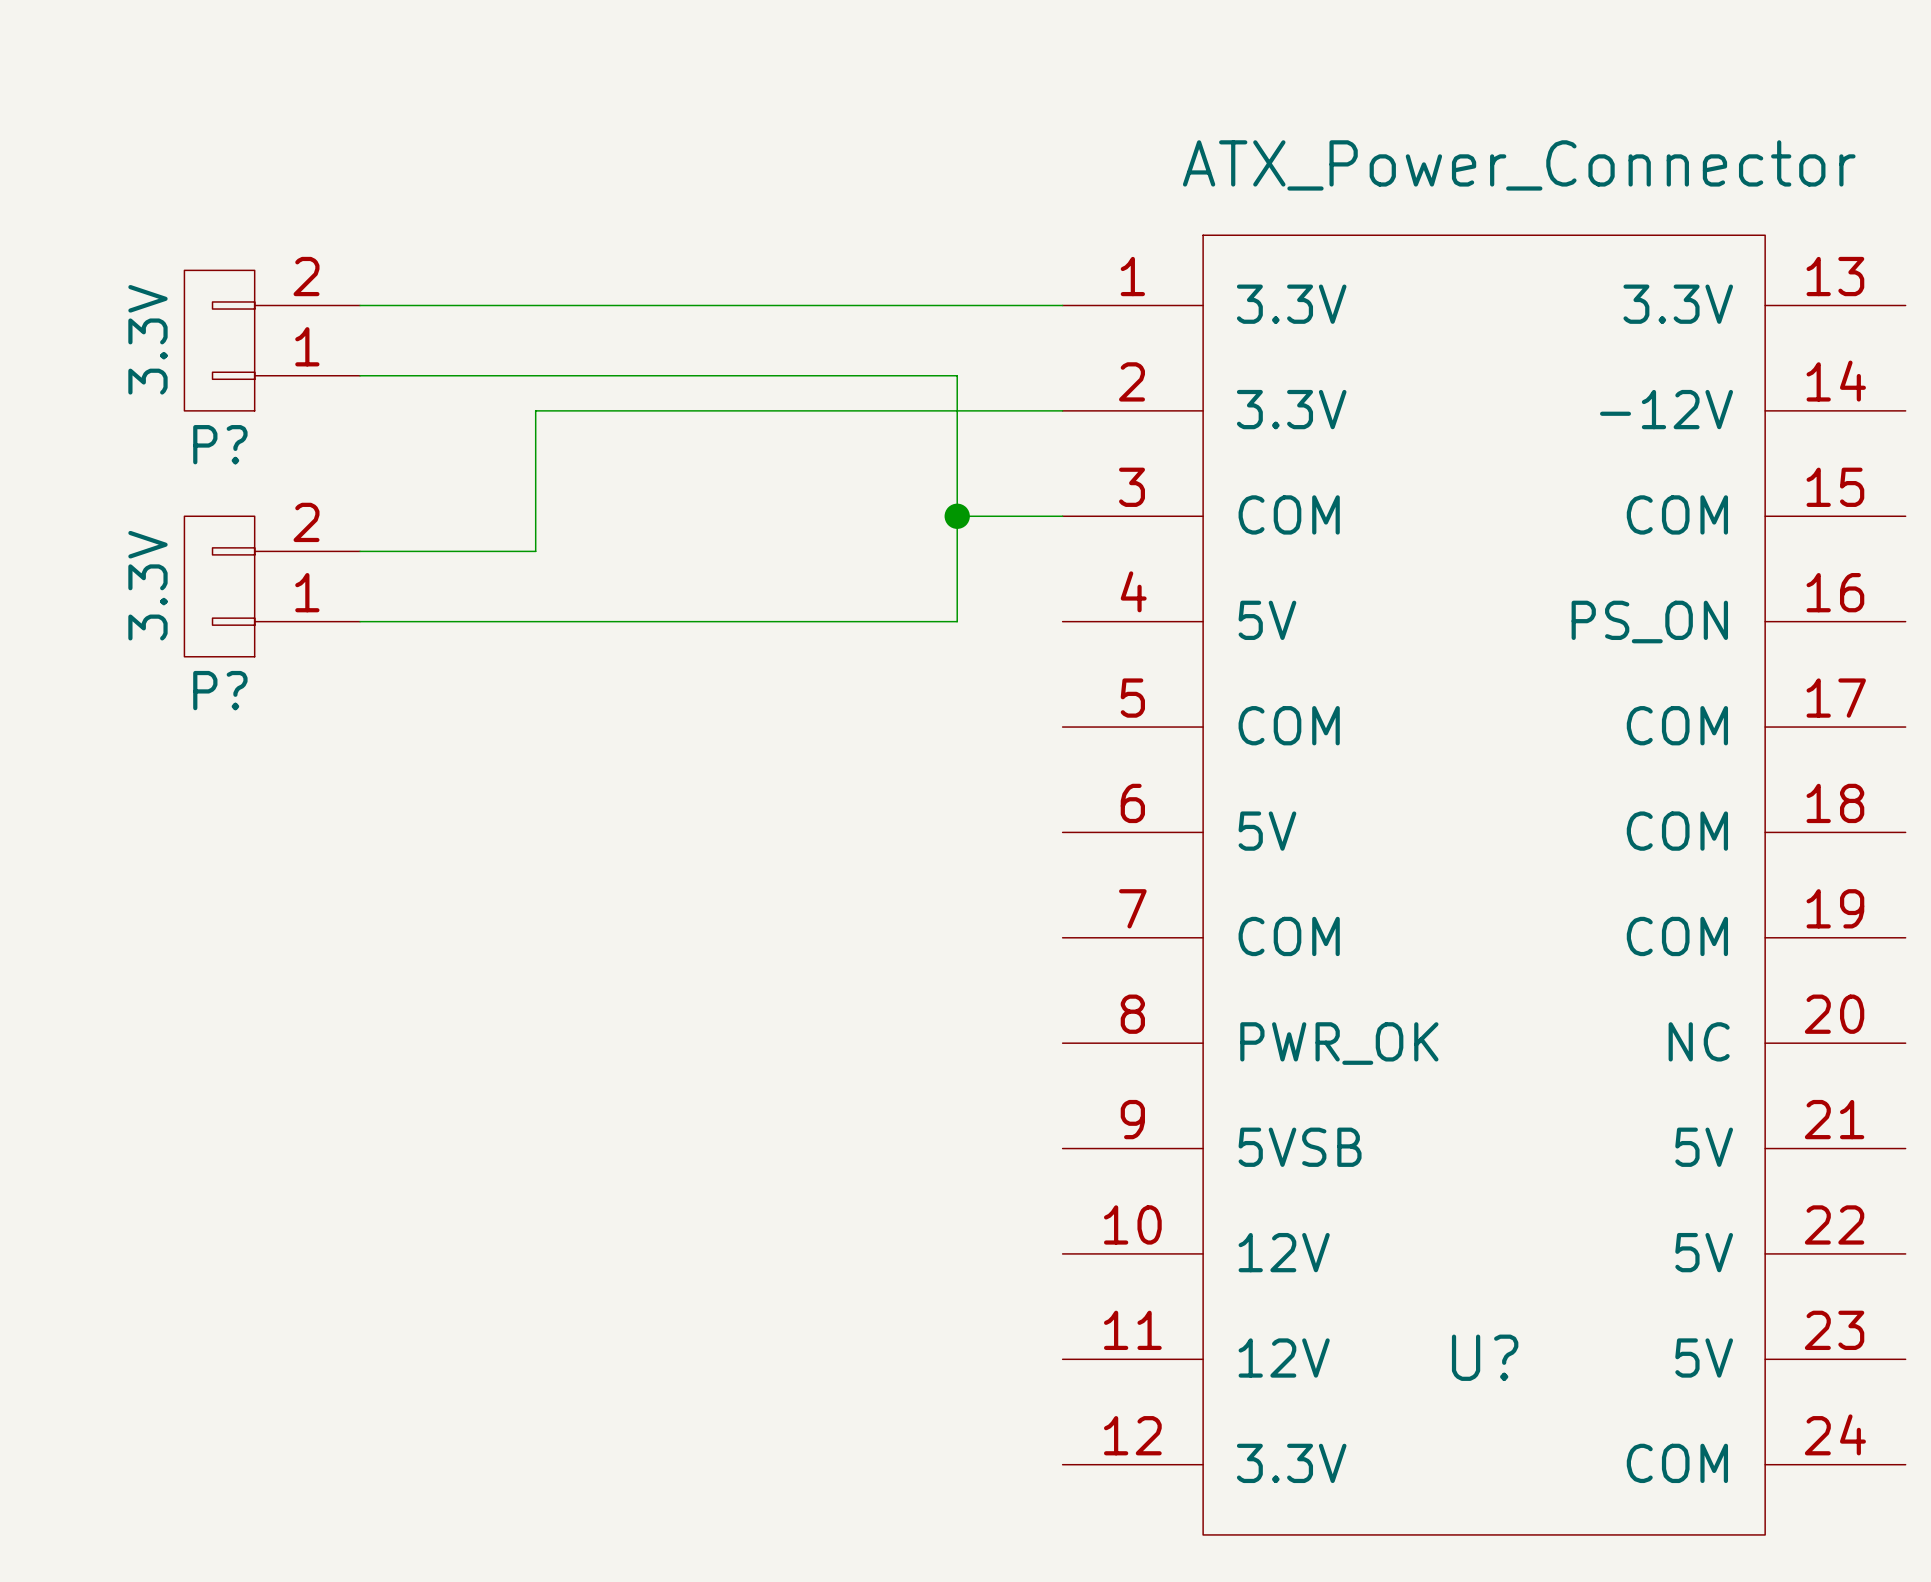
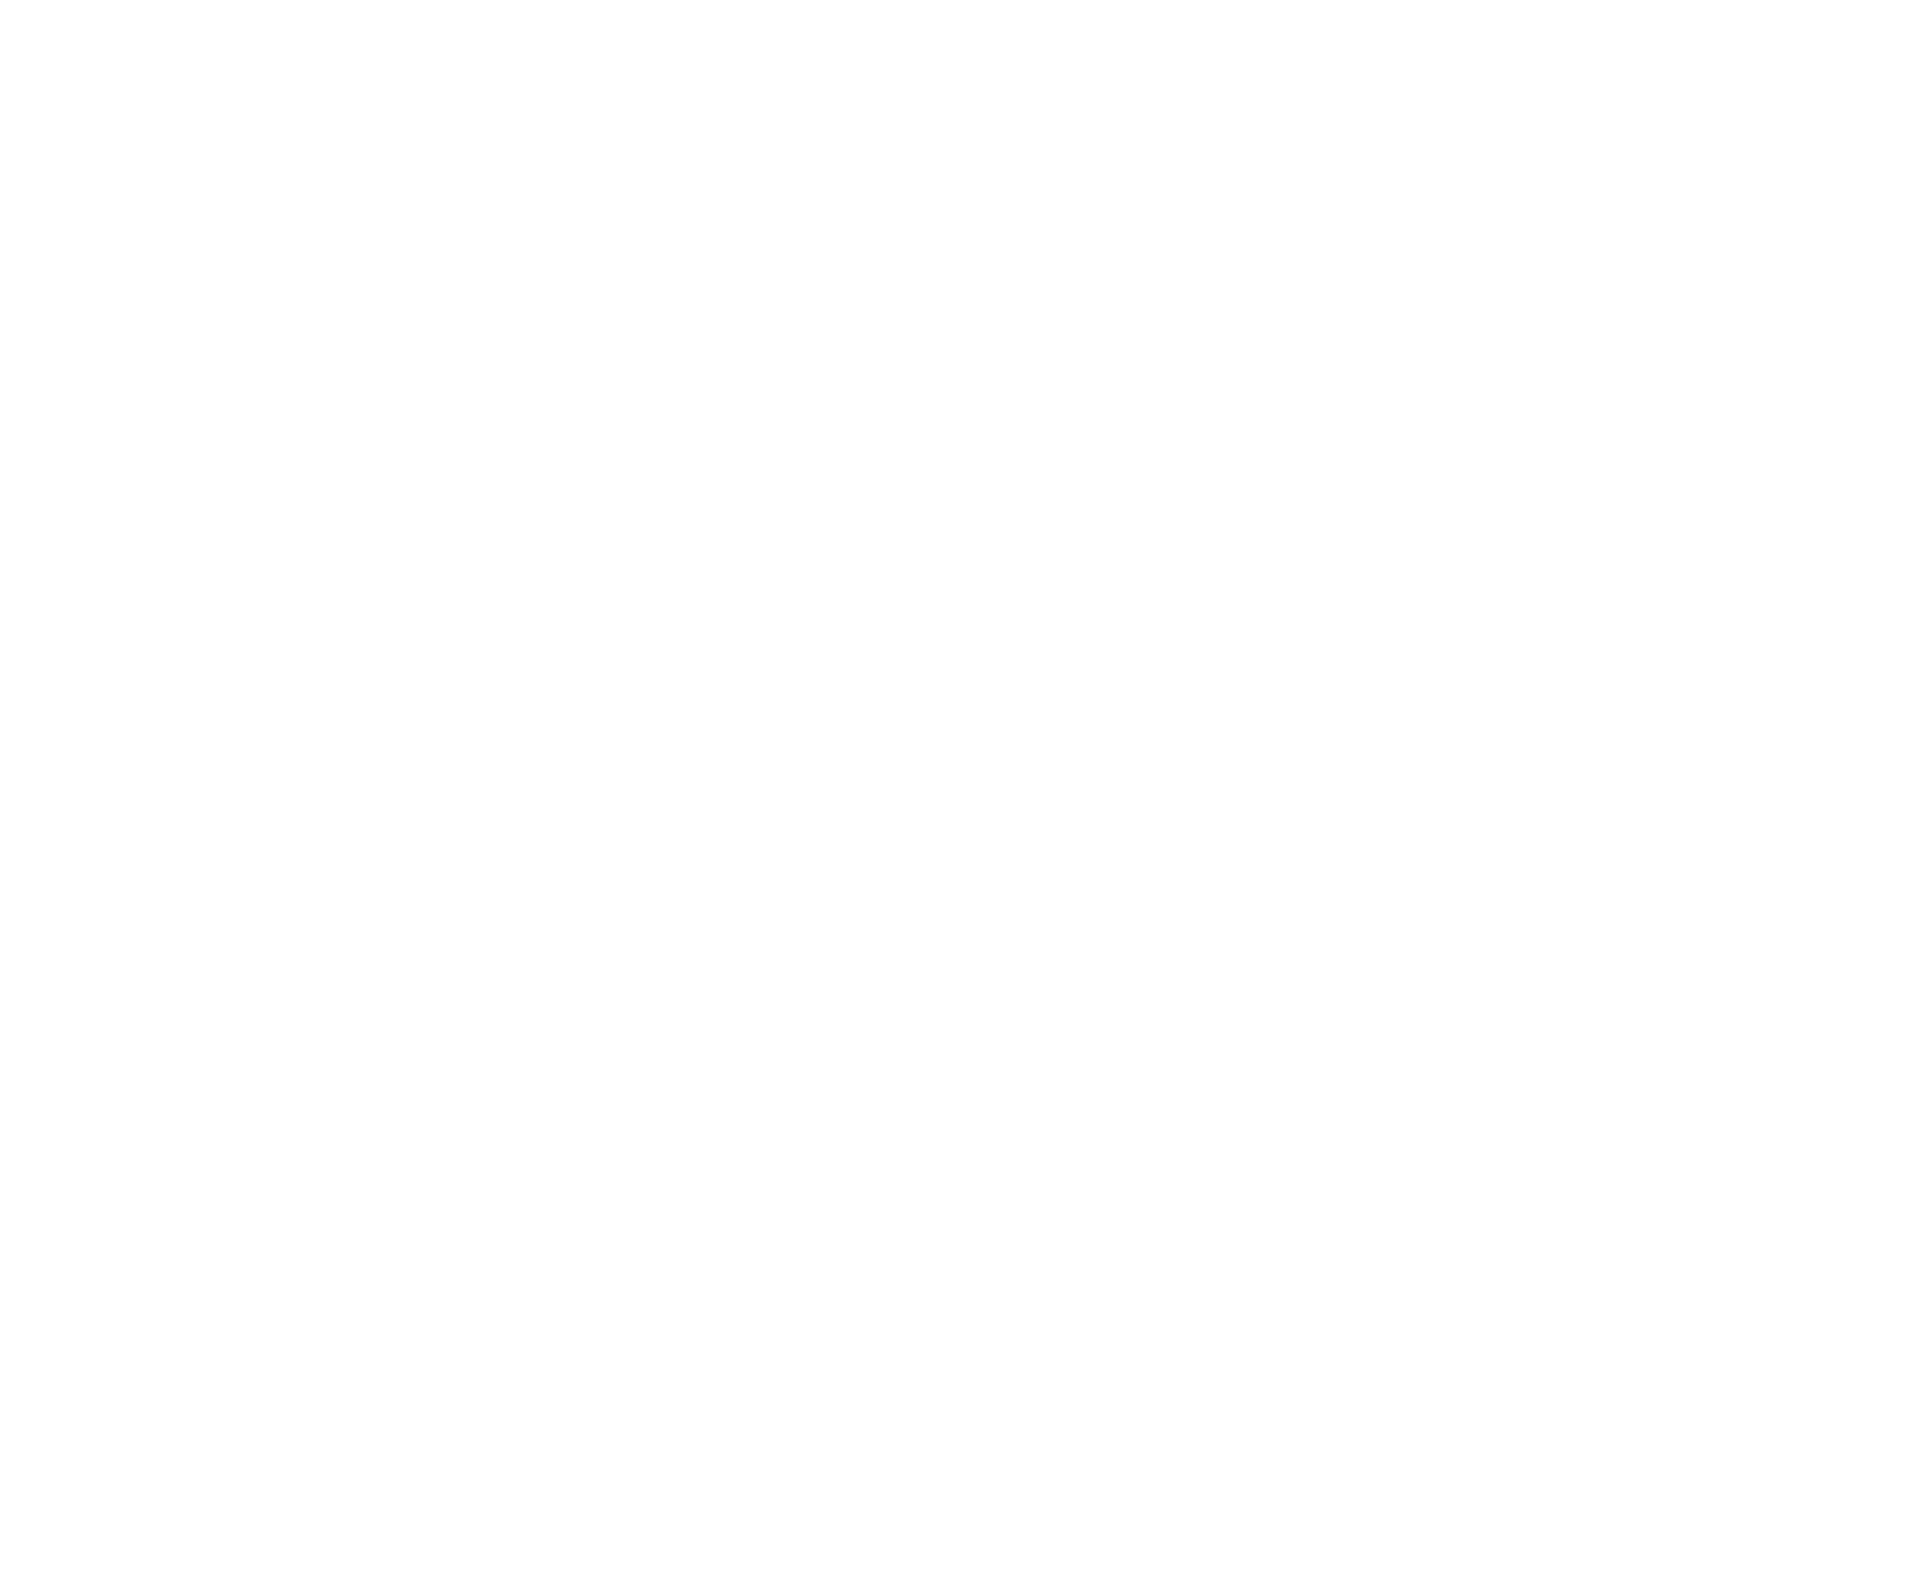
wire: (360, 305) (1062, 305) -> none
P?: 3.3V (272, 340) -> none
wire: (360, 375) (957, 375) (957, 621) (360, 621) -> none
wire: (1062, 410) (535, 410) (535, 551) (360, 551) -> none
wire: (957, 516) (1062, 516) -> none
junction: (957, 516) -> none
P?: 3.3V (272, 586) -> none
U?: ATX_Power_Connector (1484, 885) -> none

